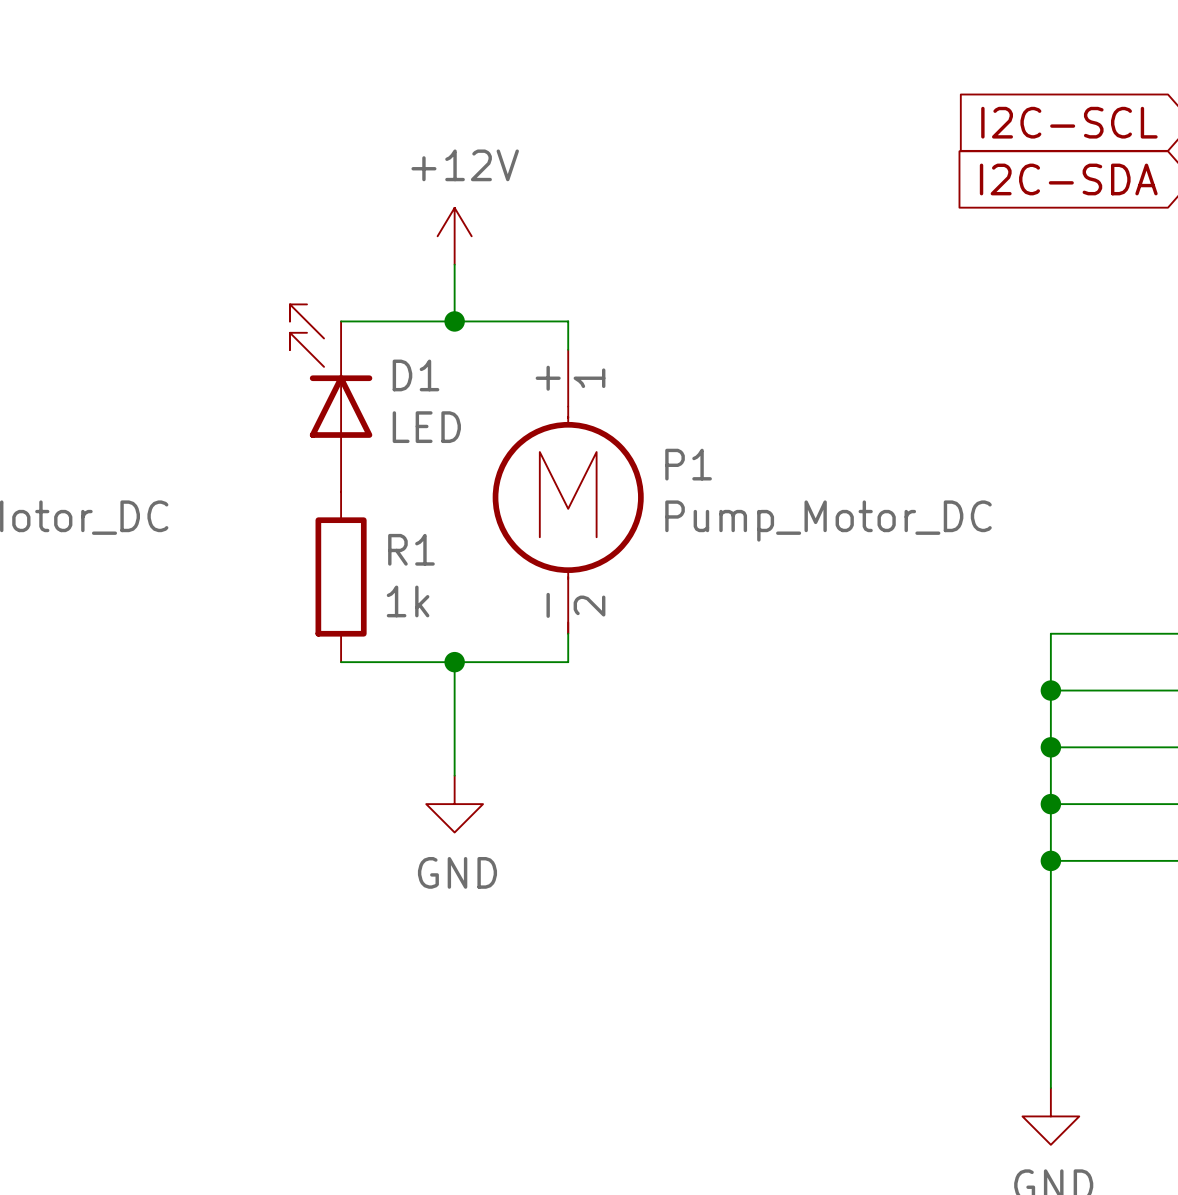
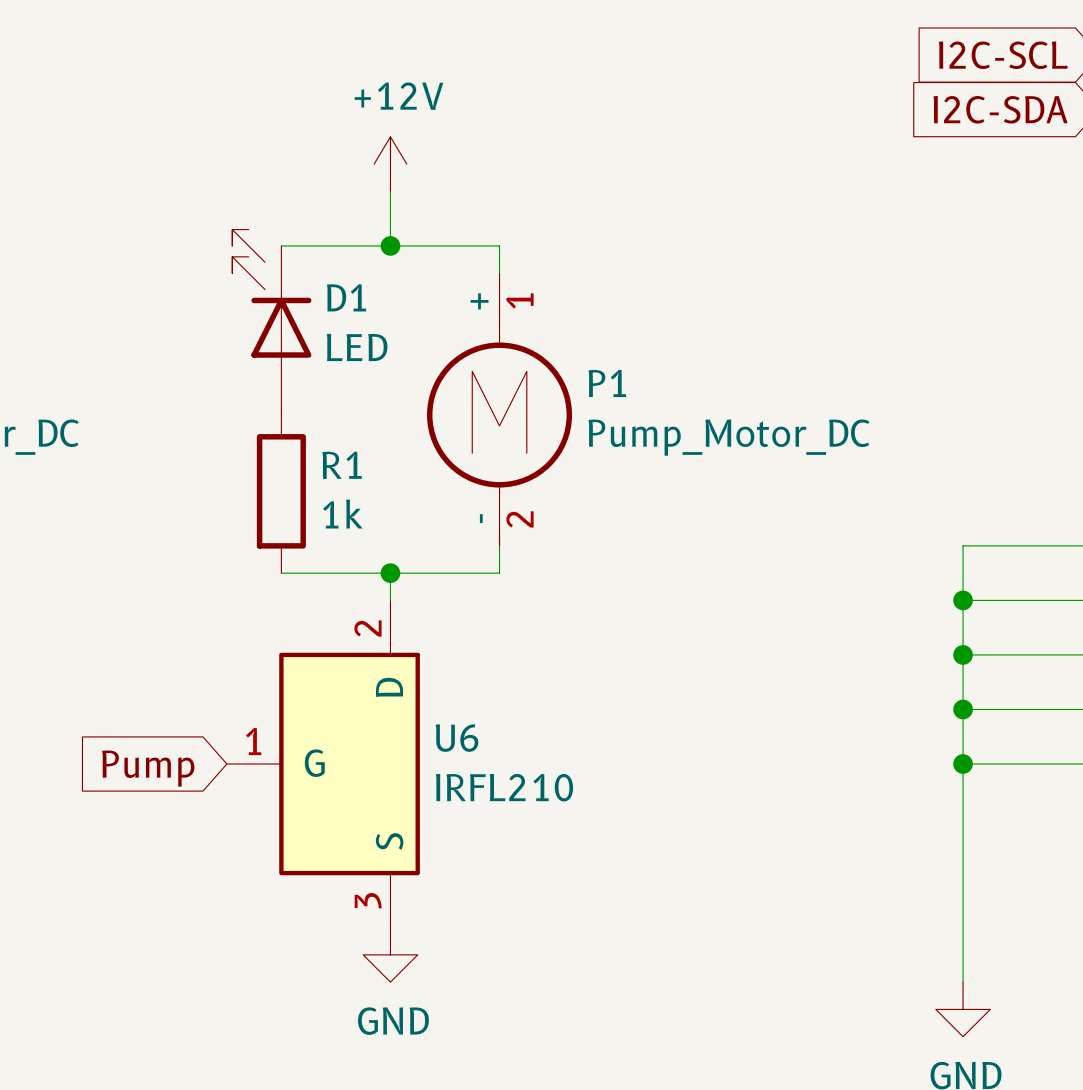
power symbol position: GND (454, 804) -> GND (390, 954)
U6: none -> IRFL210 (323, 764)
global label: none -> Pump (148, 768)

